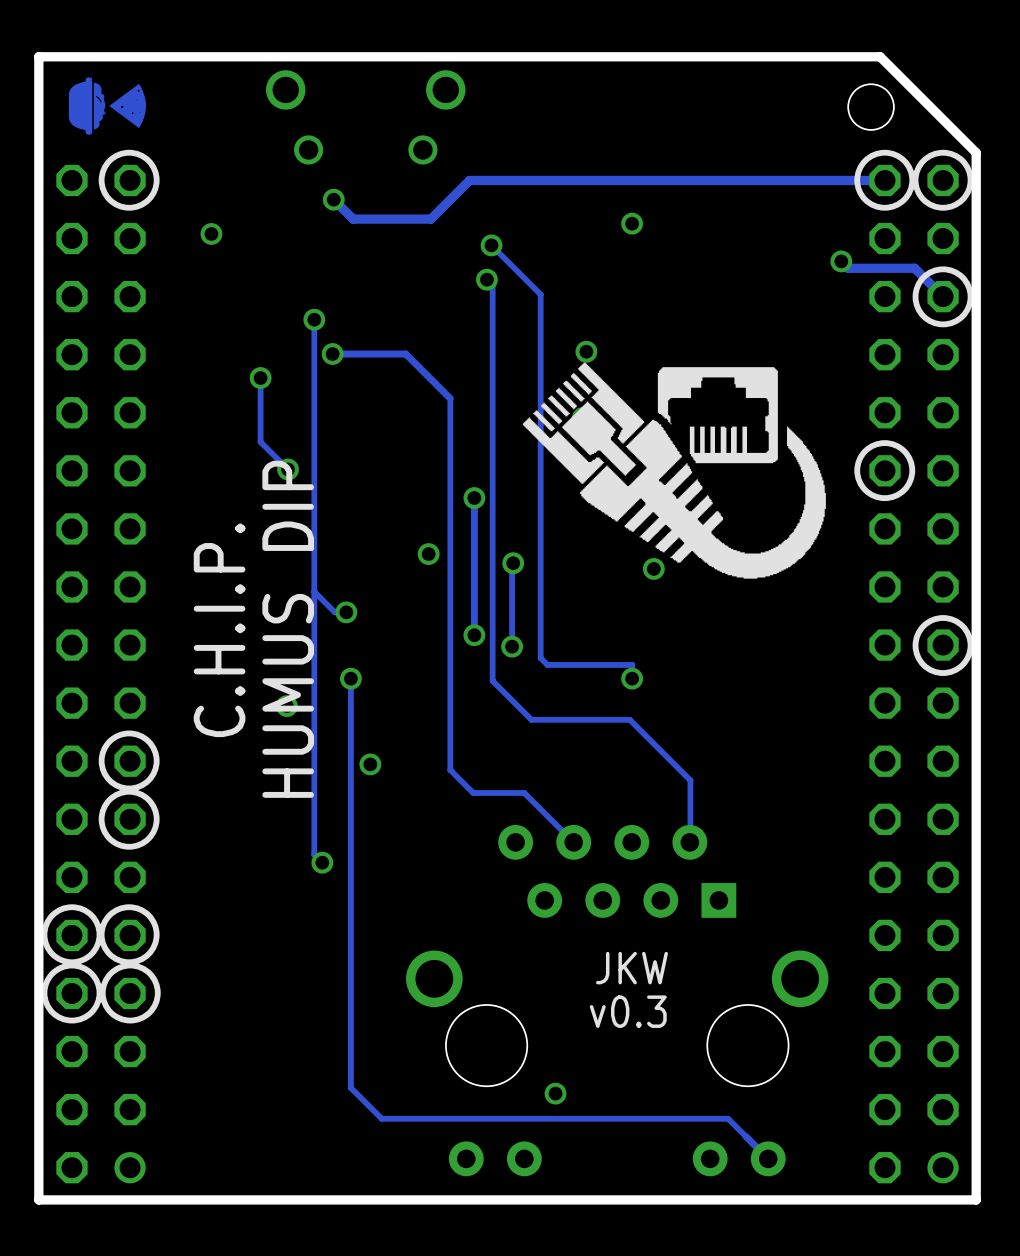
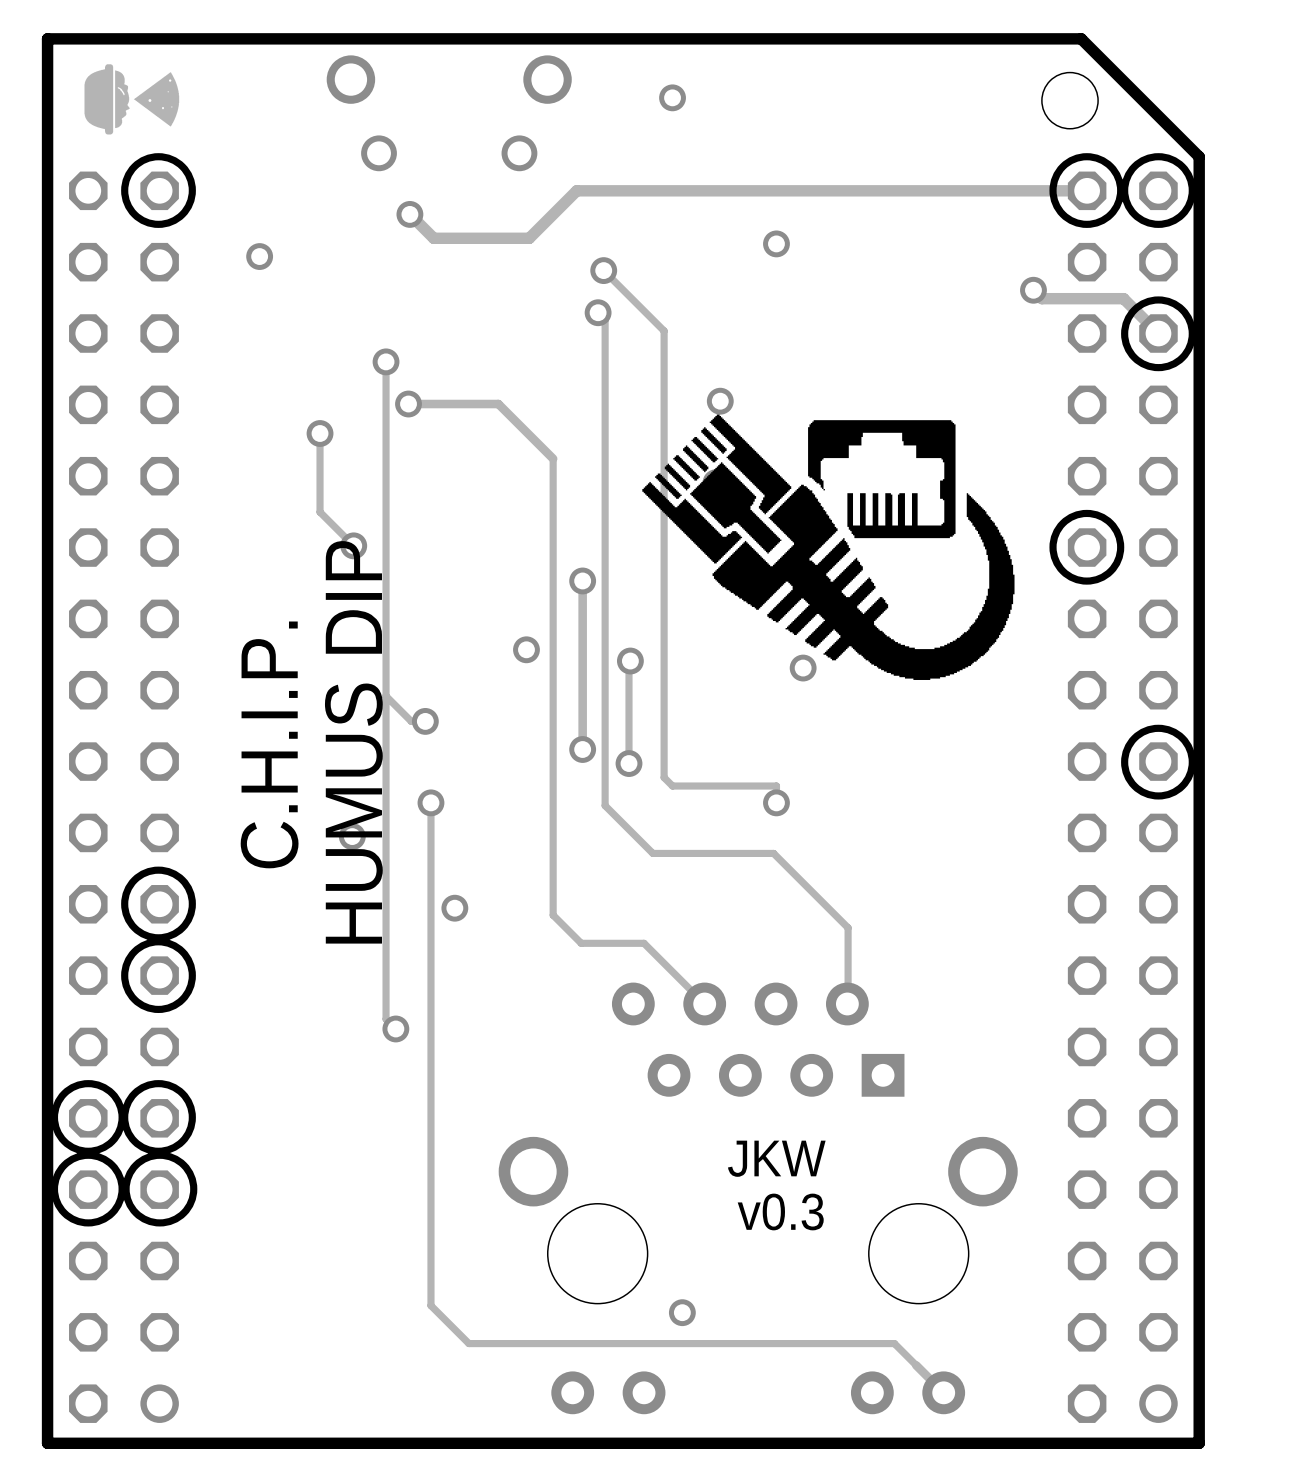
via: none -> (672, 97)

